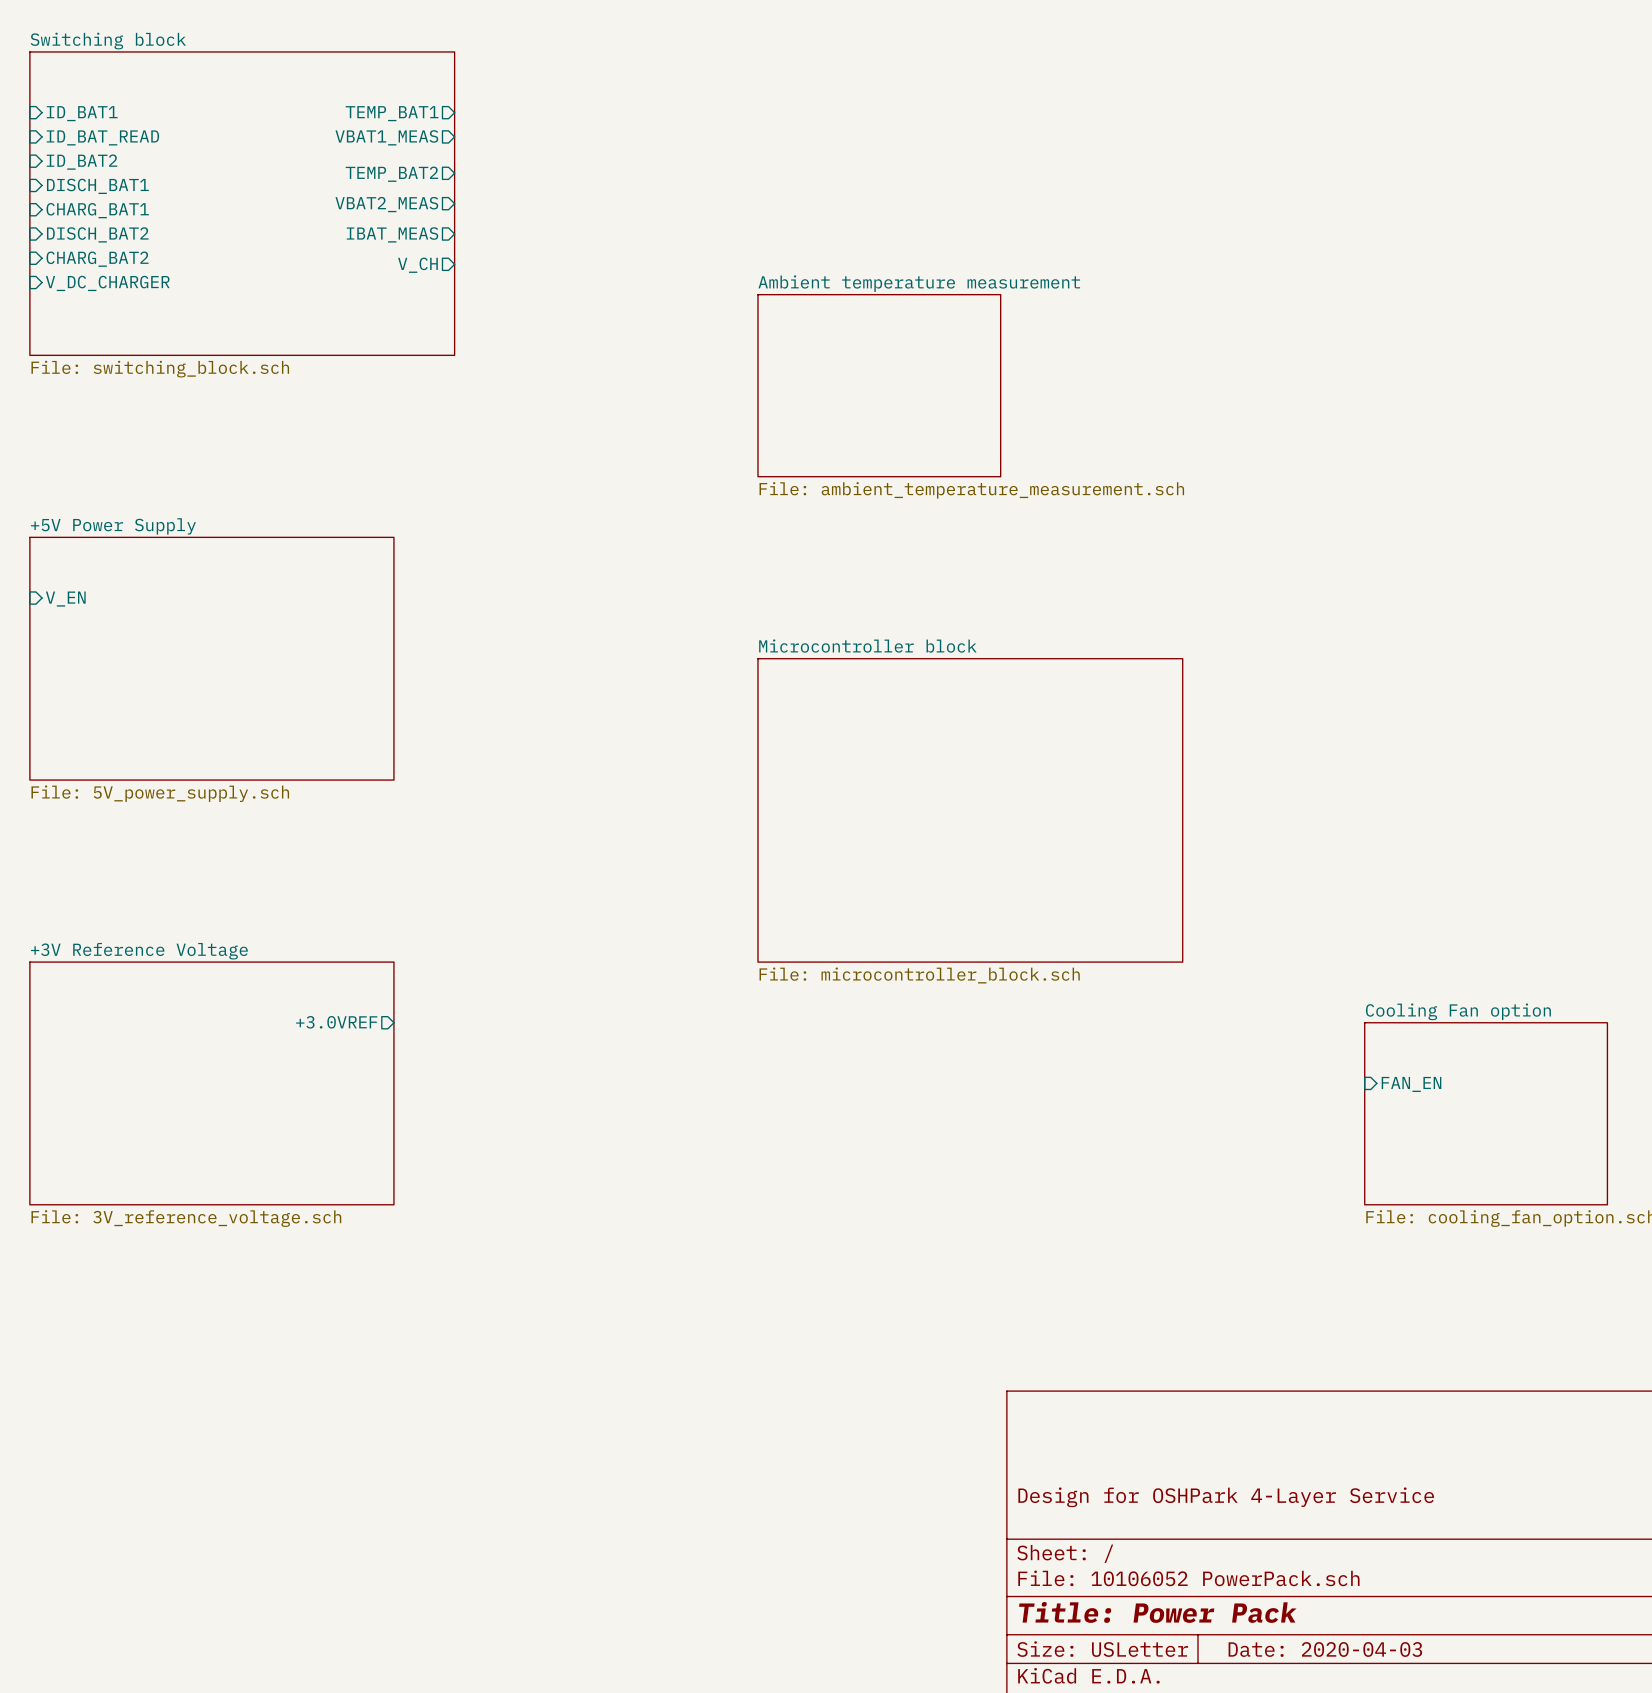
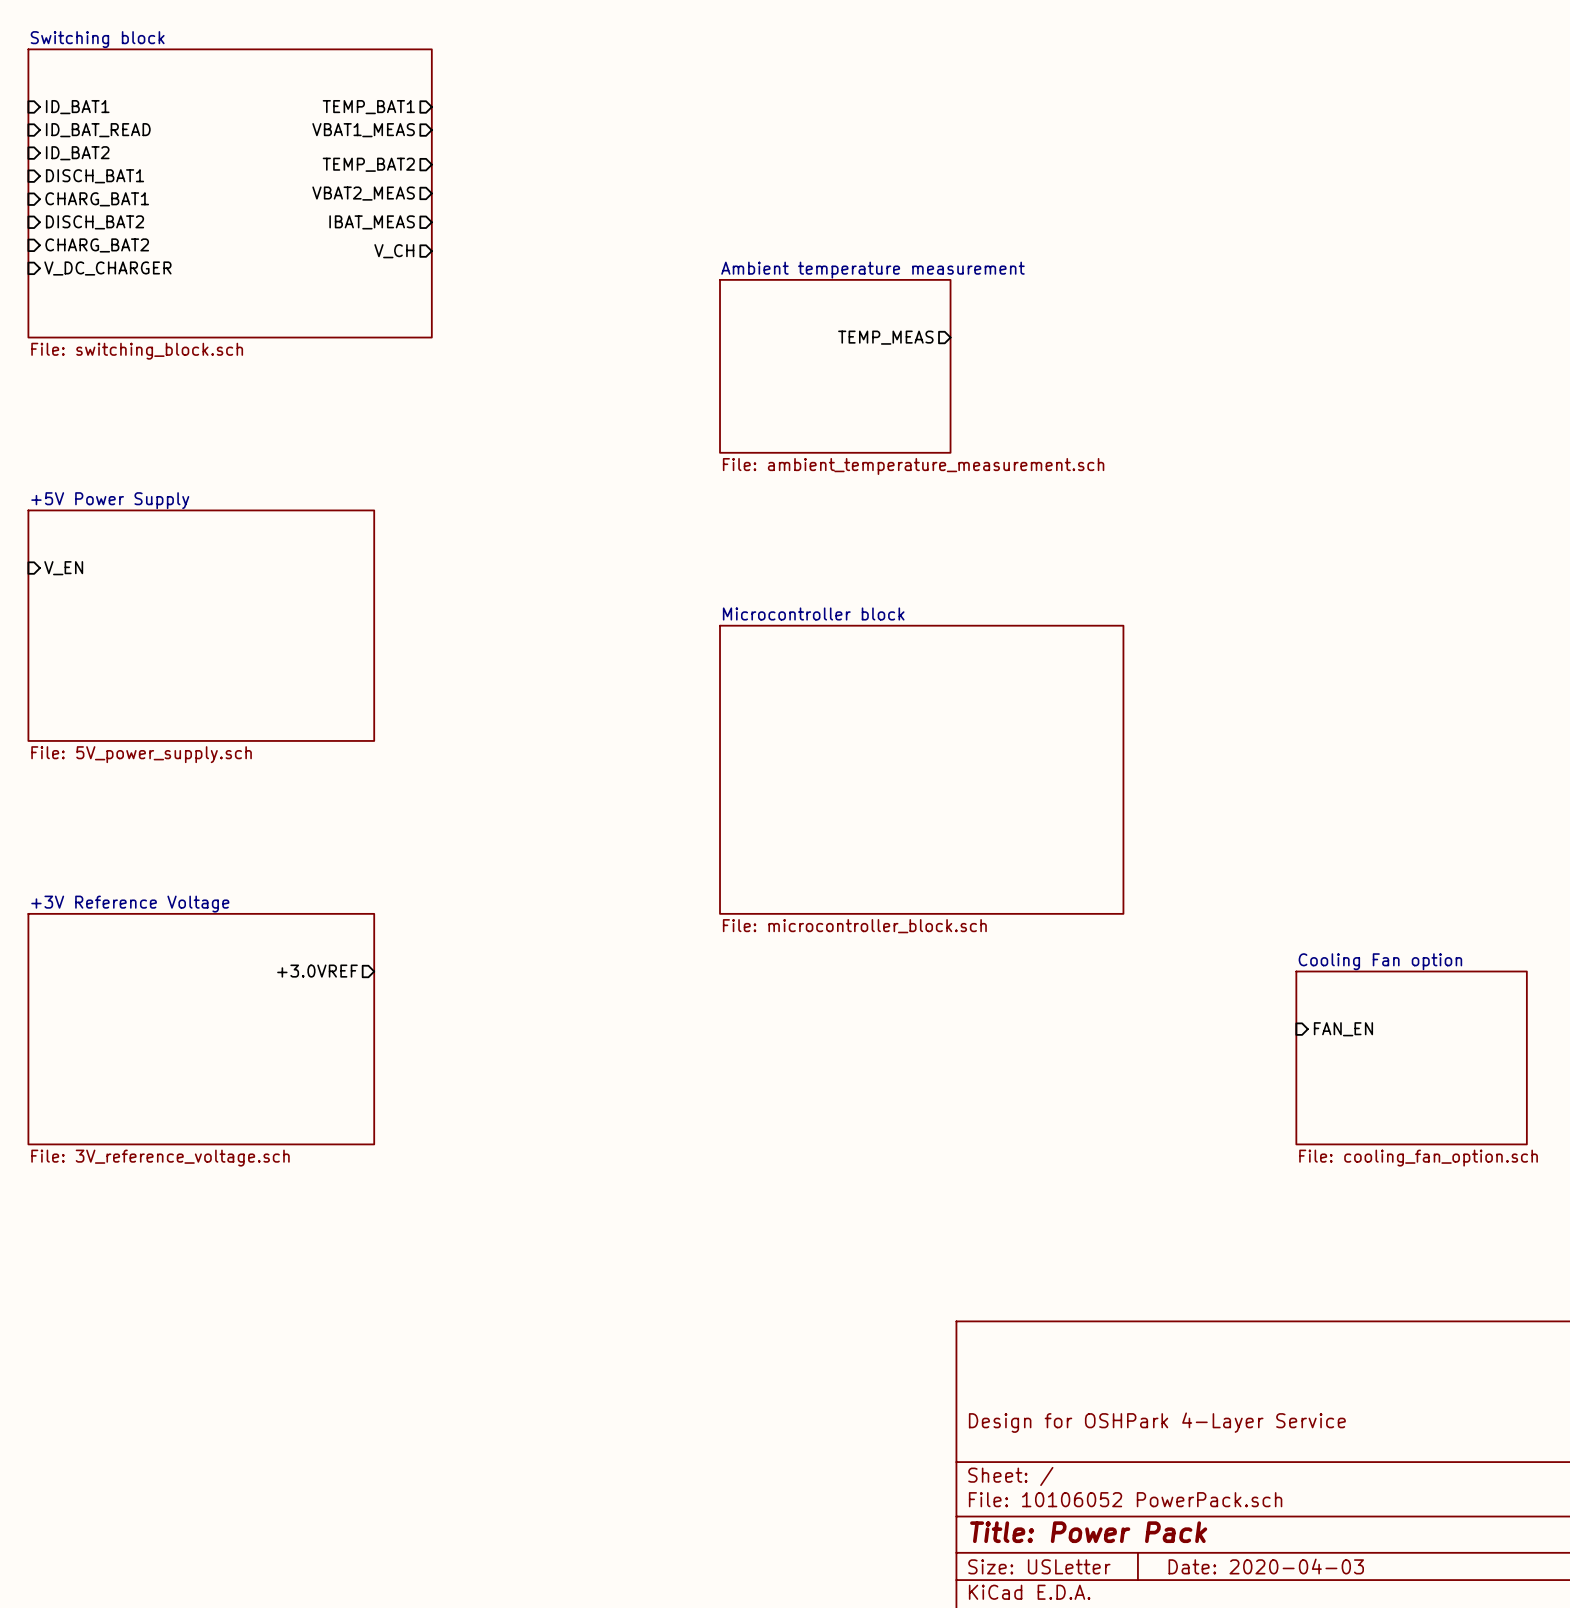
sheet pin: none -> TEMP_MEAS (885, 337)

